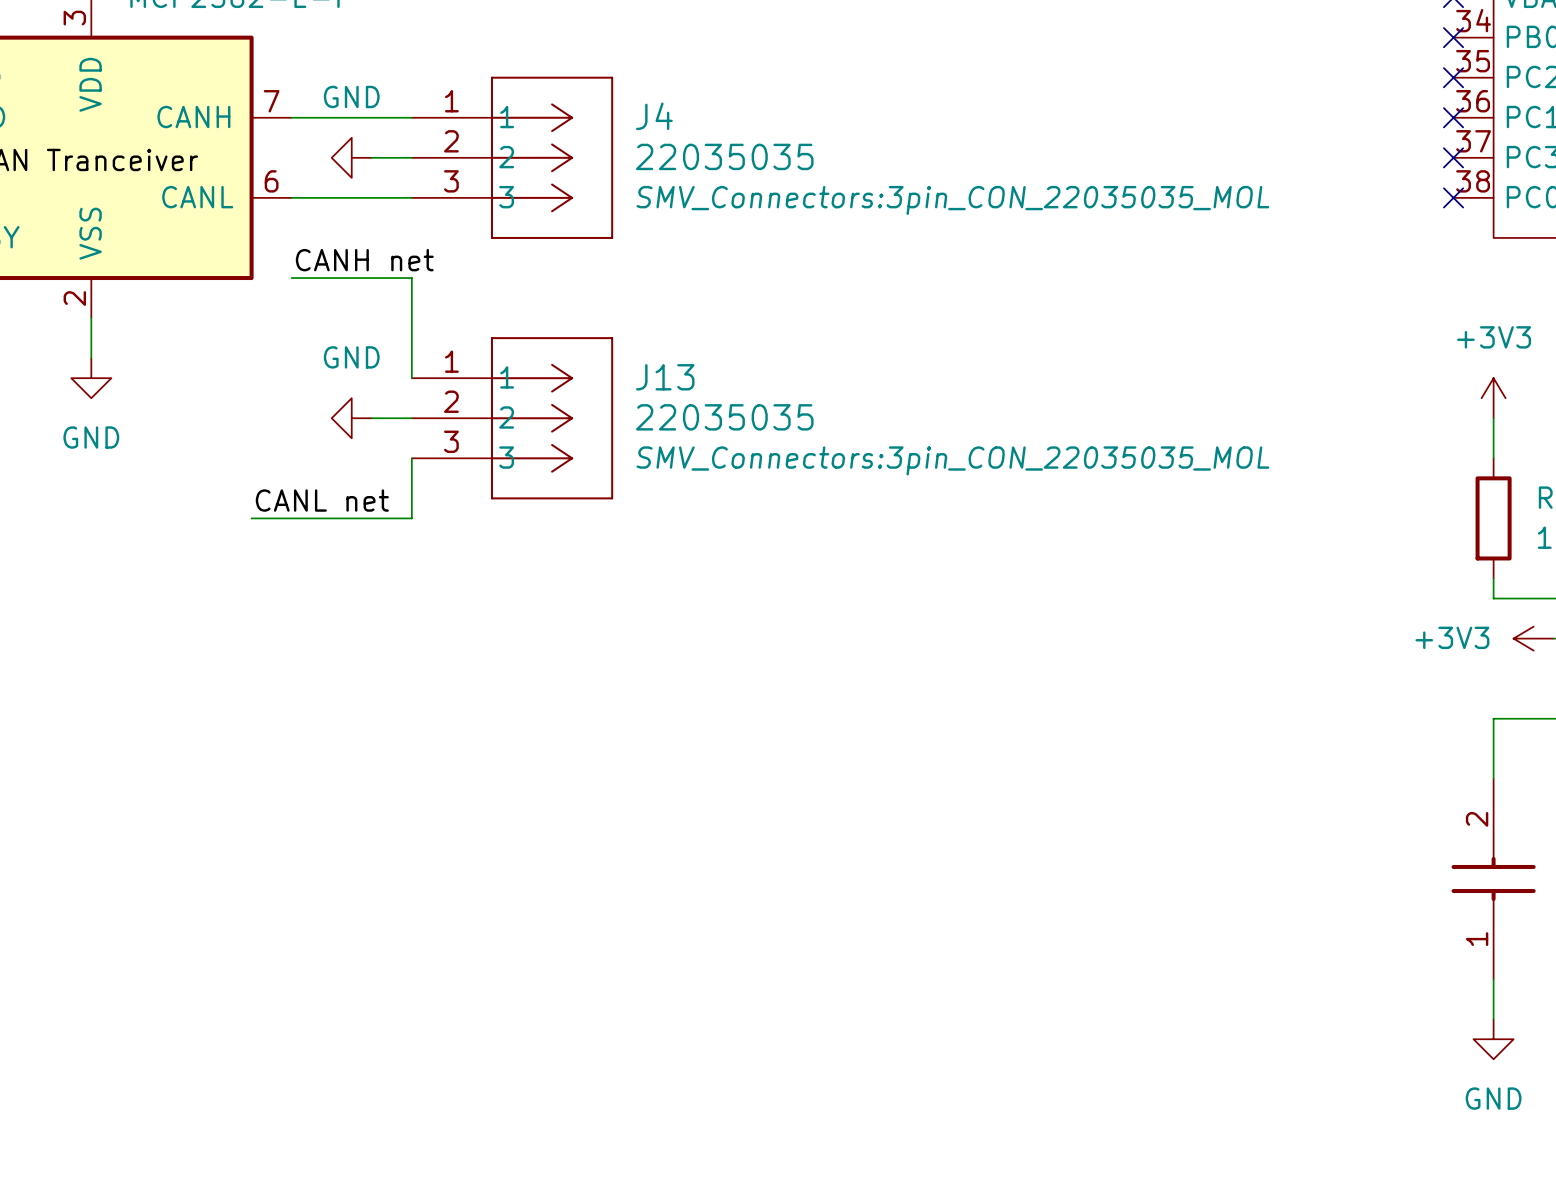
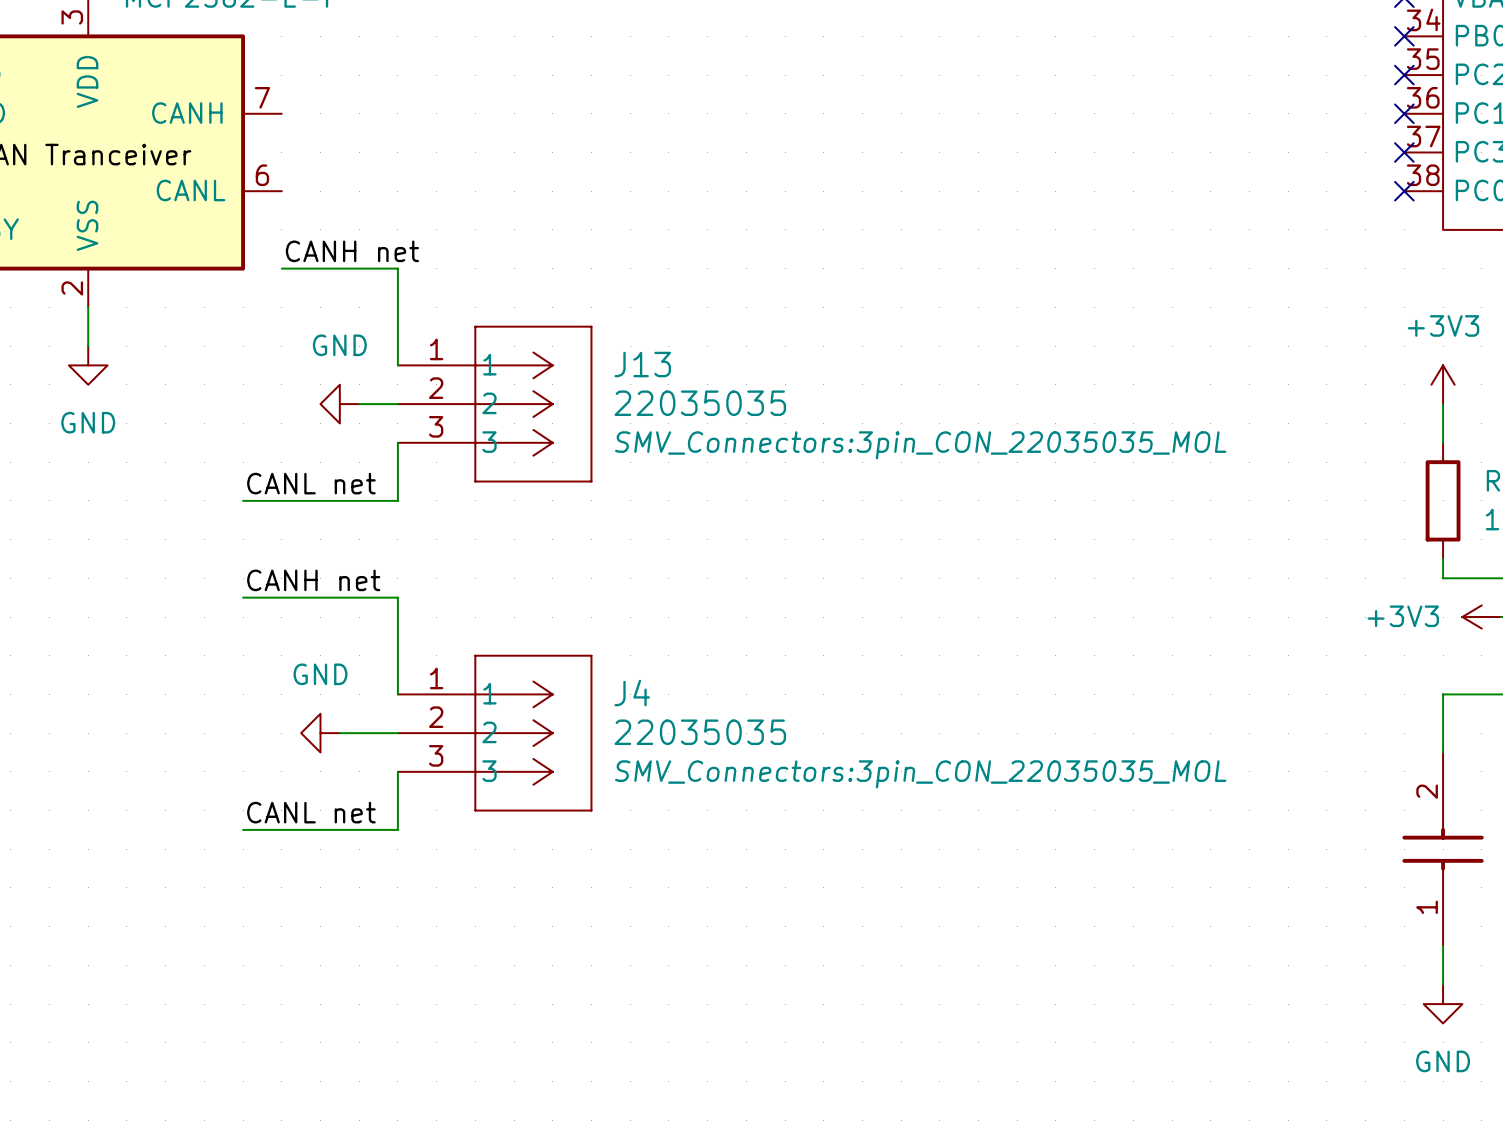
wire: (291, 117) (411, 117) -> none
power symbol: GND (351, 157) -> none
wire: (371, 157) (411, 157) -> none
J4 position: (512, 157) -> (495, 733)
wire: (291, 197) (411, 197) -> none
label: none -> CANH net (313, 580)
wire: none -> (243, 597) (397, 597) (397, 694)
power symbol: none -> GND (320, 733)
wire: none -> (339, 733) (397, 733)
wire: none -> (397, 771) (397, 829) (243, 829)
label: none -> CANL net (311, 812)

